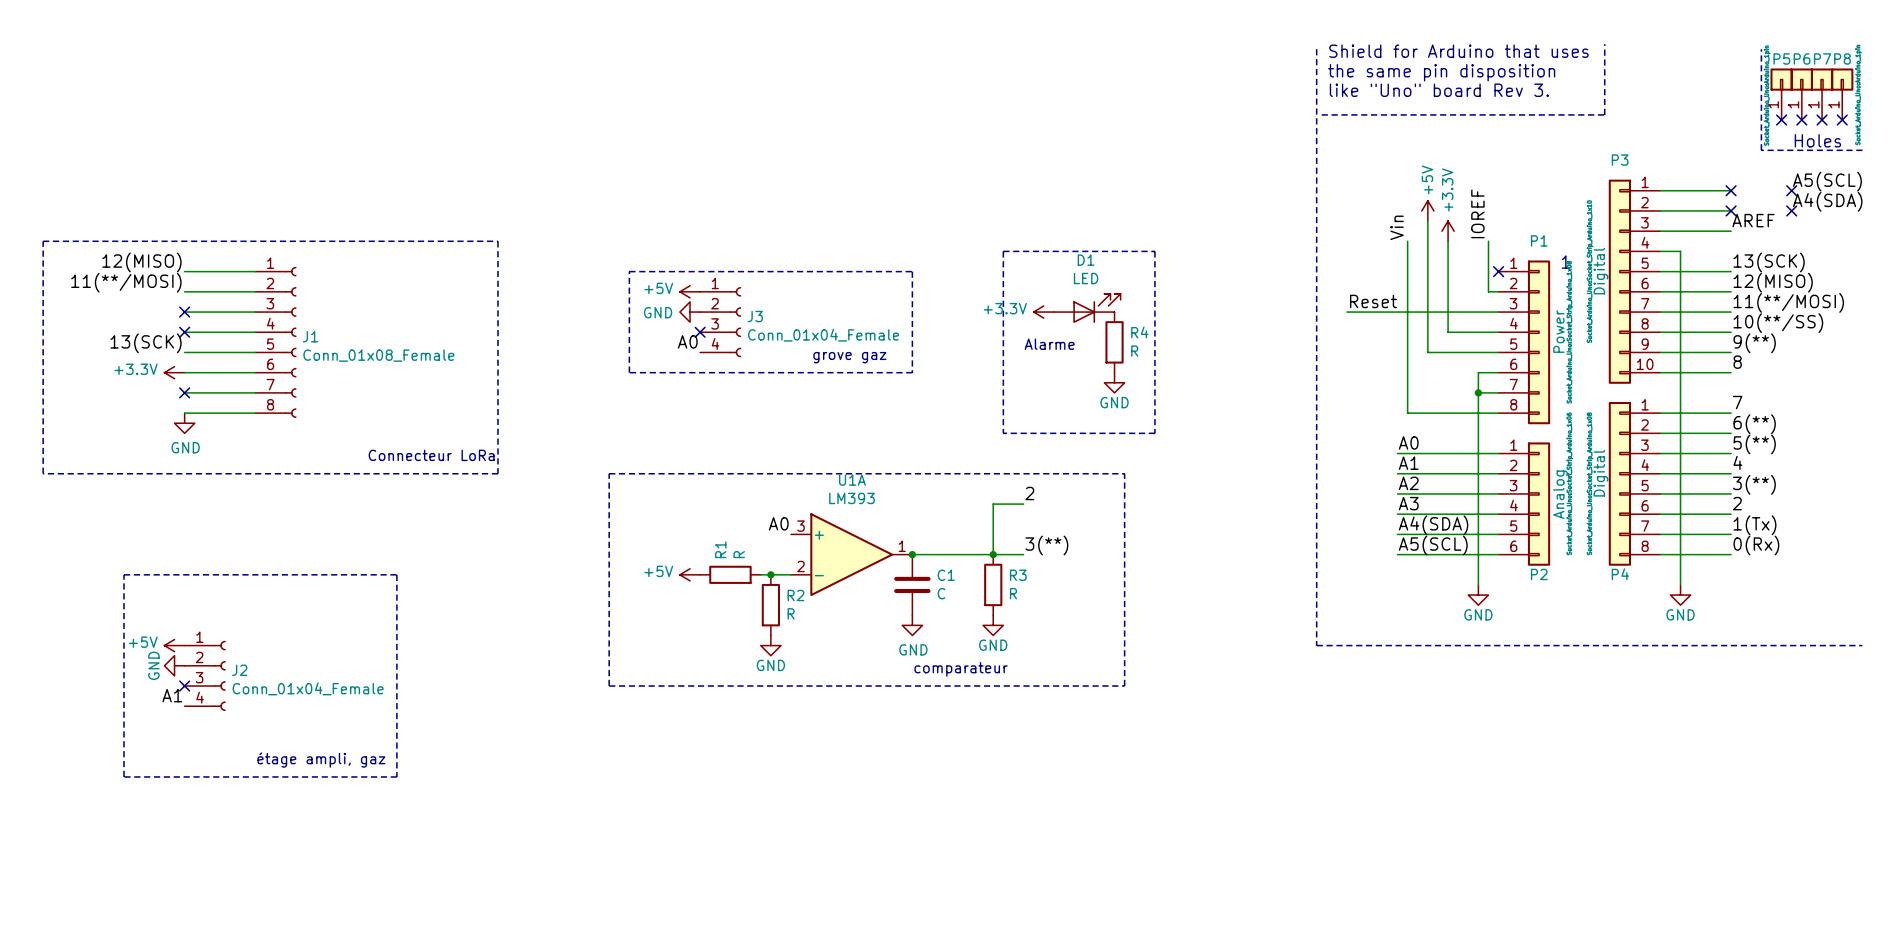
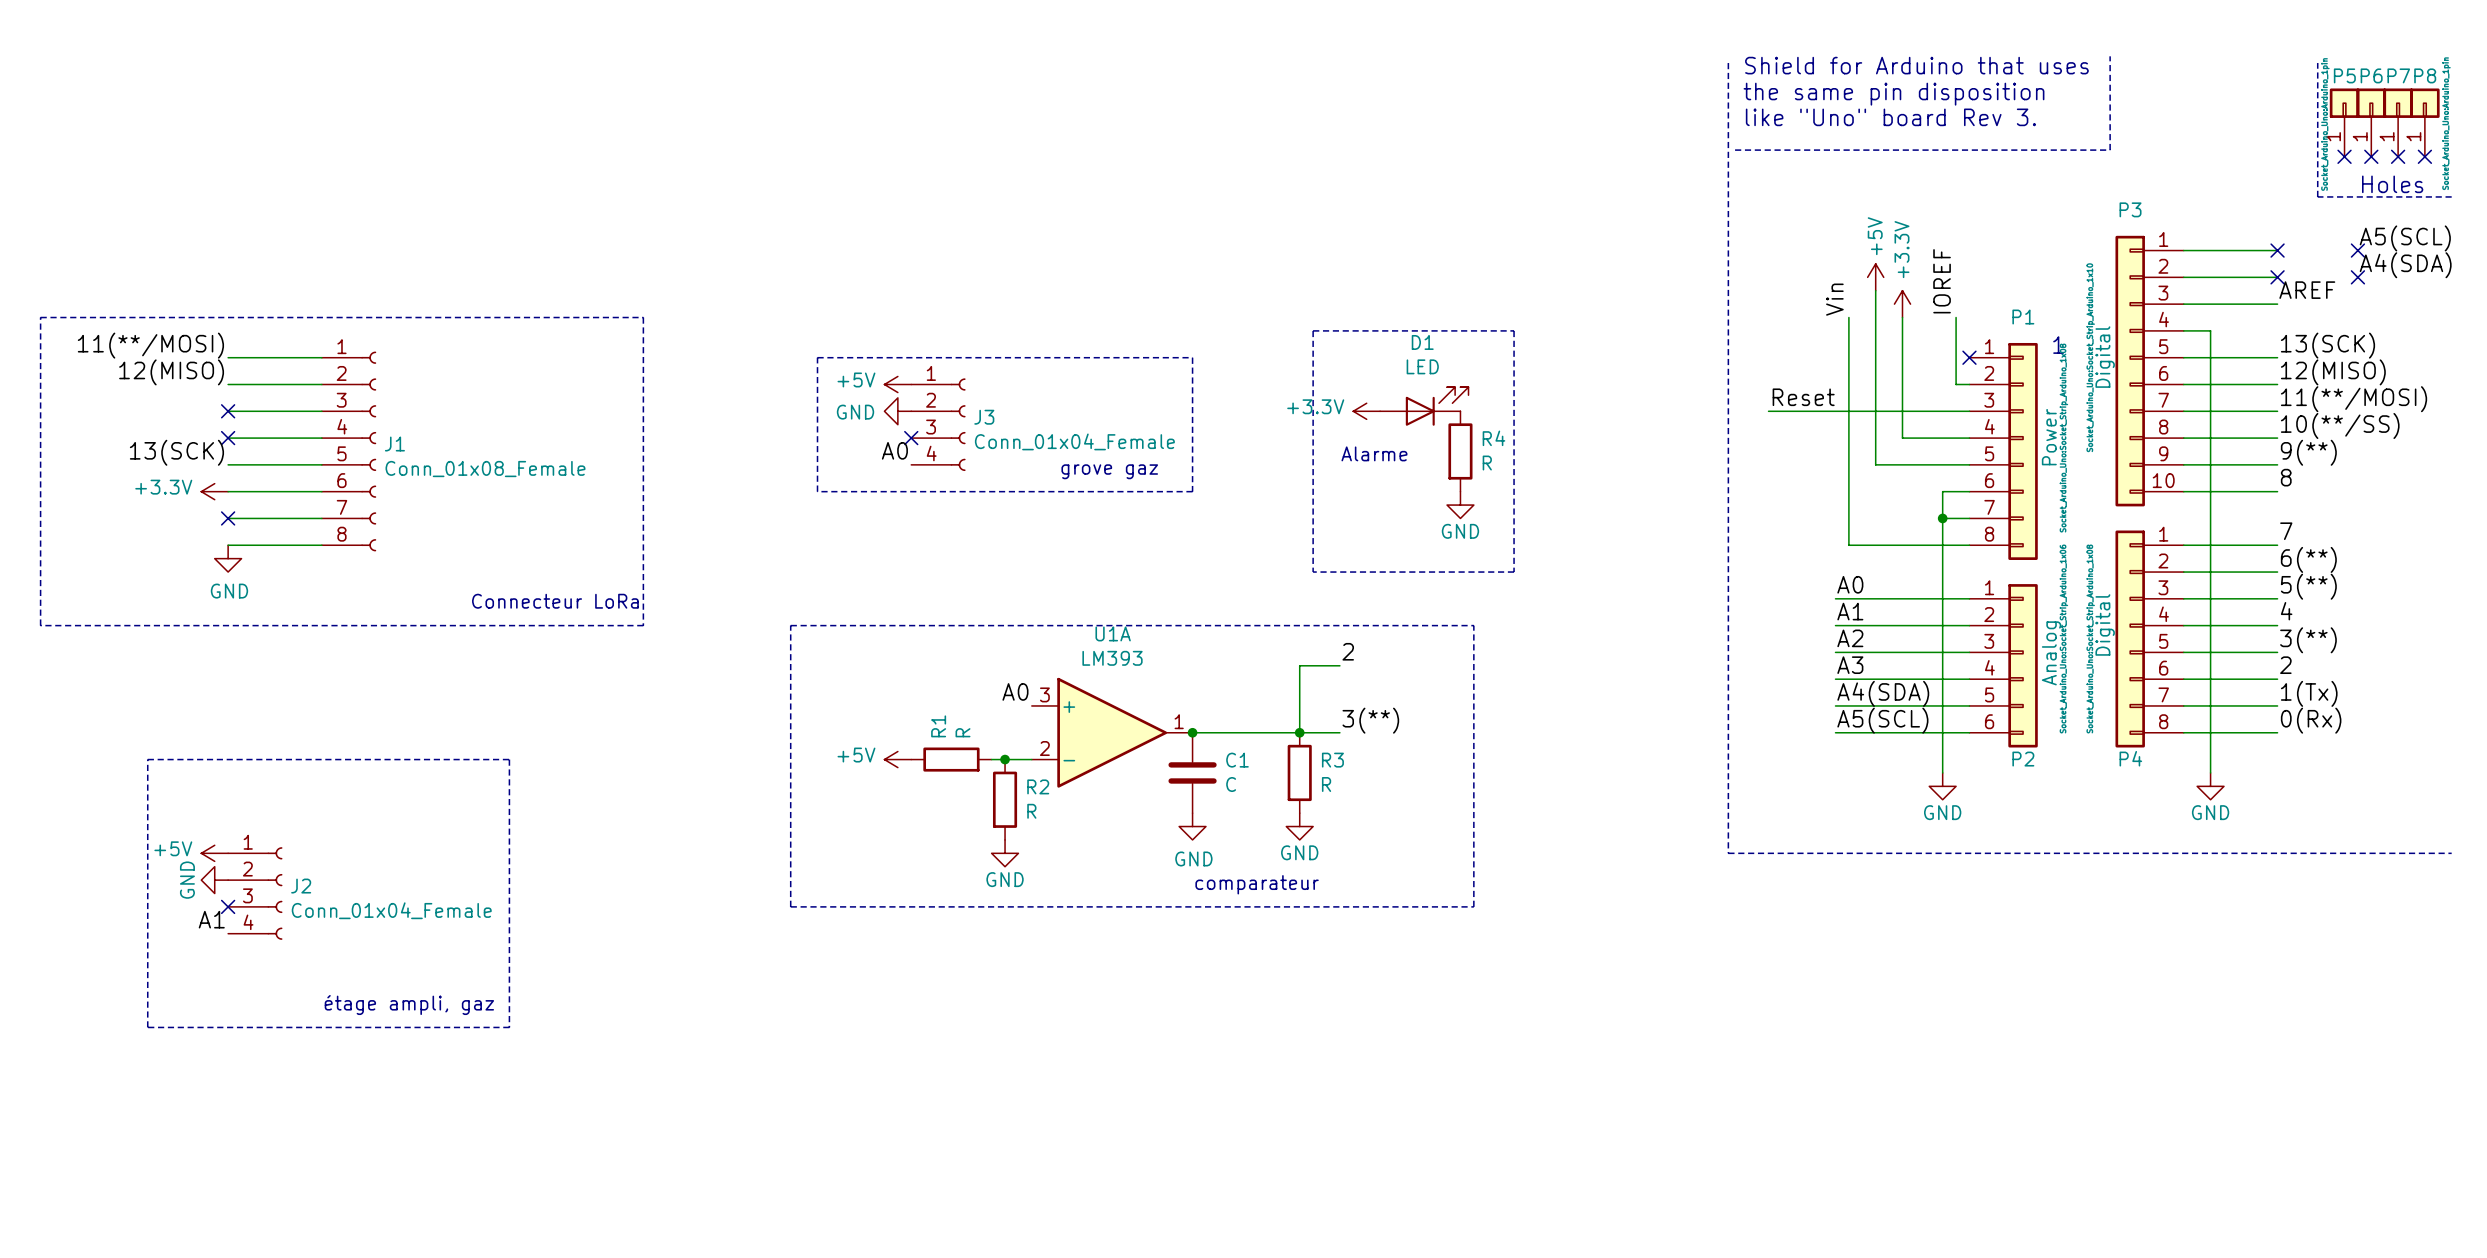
label: 12(MISO) (141, 262) -> 11(**/MOSI) (150, 345)
label: 11(**/MOSI) (126, 282) -> 12(MISO) (171, 372)

